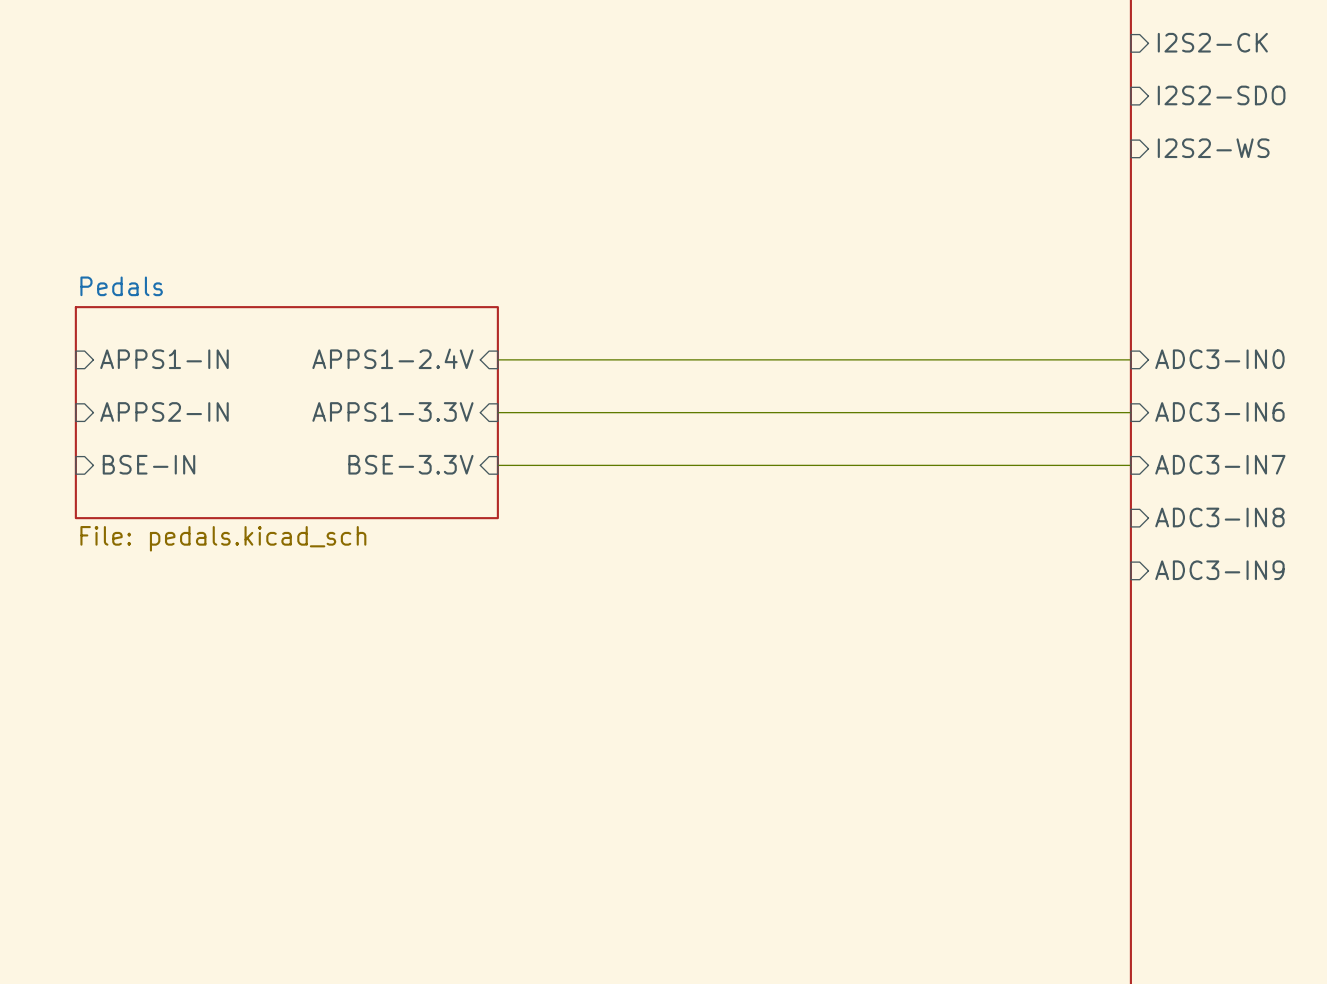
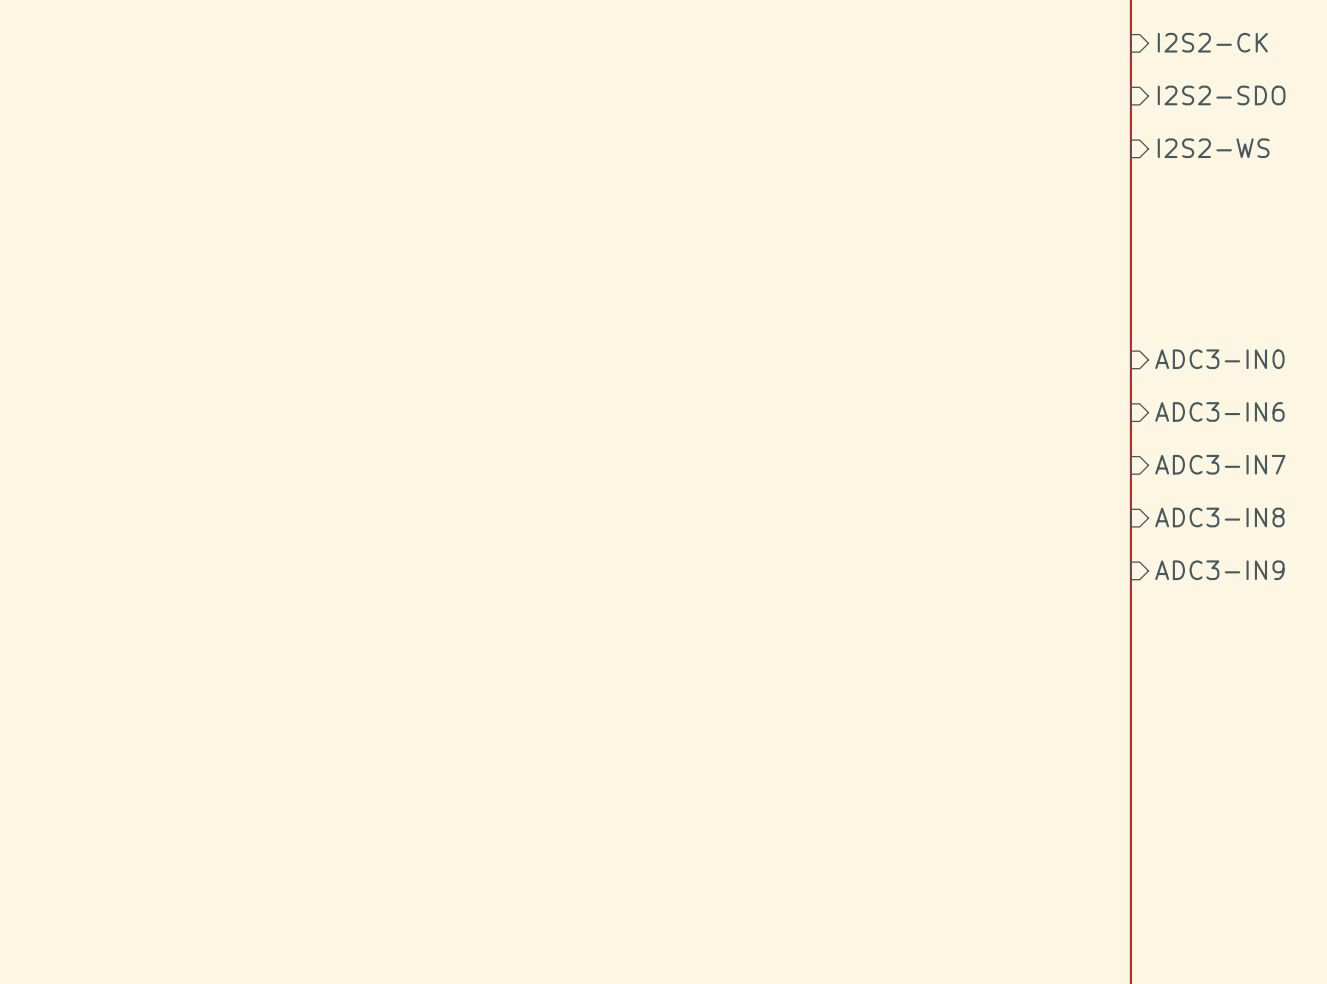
sheet pin: APPS1-2.4V (392, 358) -> none
sheet pin: APPS1-IN (164, 359) -> none
wire: (497, 359) (1130, 359) -> none
sheet pin: APPS2-IN (164, 411) -> none
sheet pin: APPS1-3.3V (392, 411) -> none
sheet Pedals: File: pedals.kicad_sch (286, 412) -> none
wire: (497, 412) (1130, 412) -> none
sheet pin: BSE-IN (148, 464) -> none
sheet pin: BSE-3.3V (410, 464) -> none
wire: (497, 465) (1130, 465) -> none

